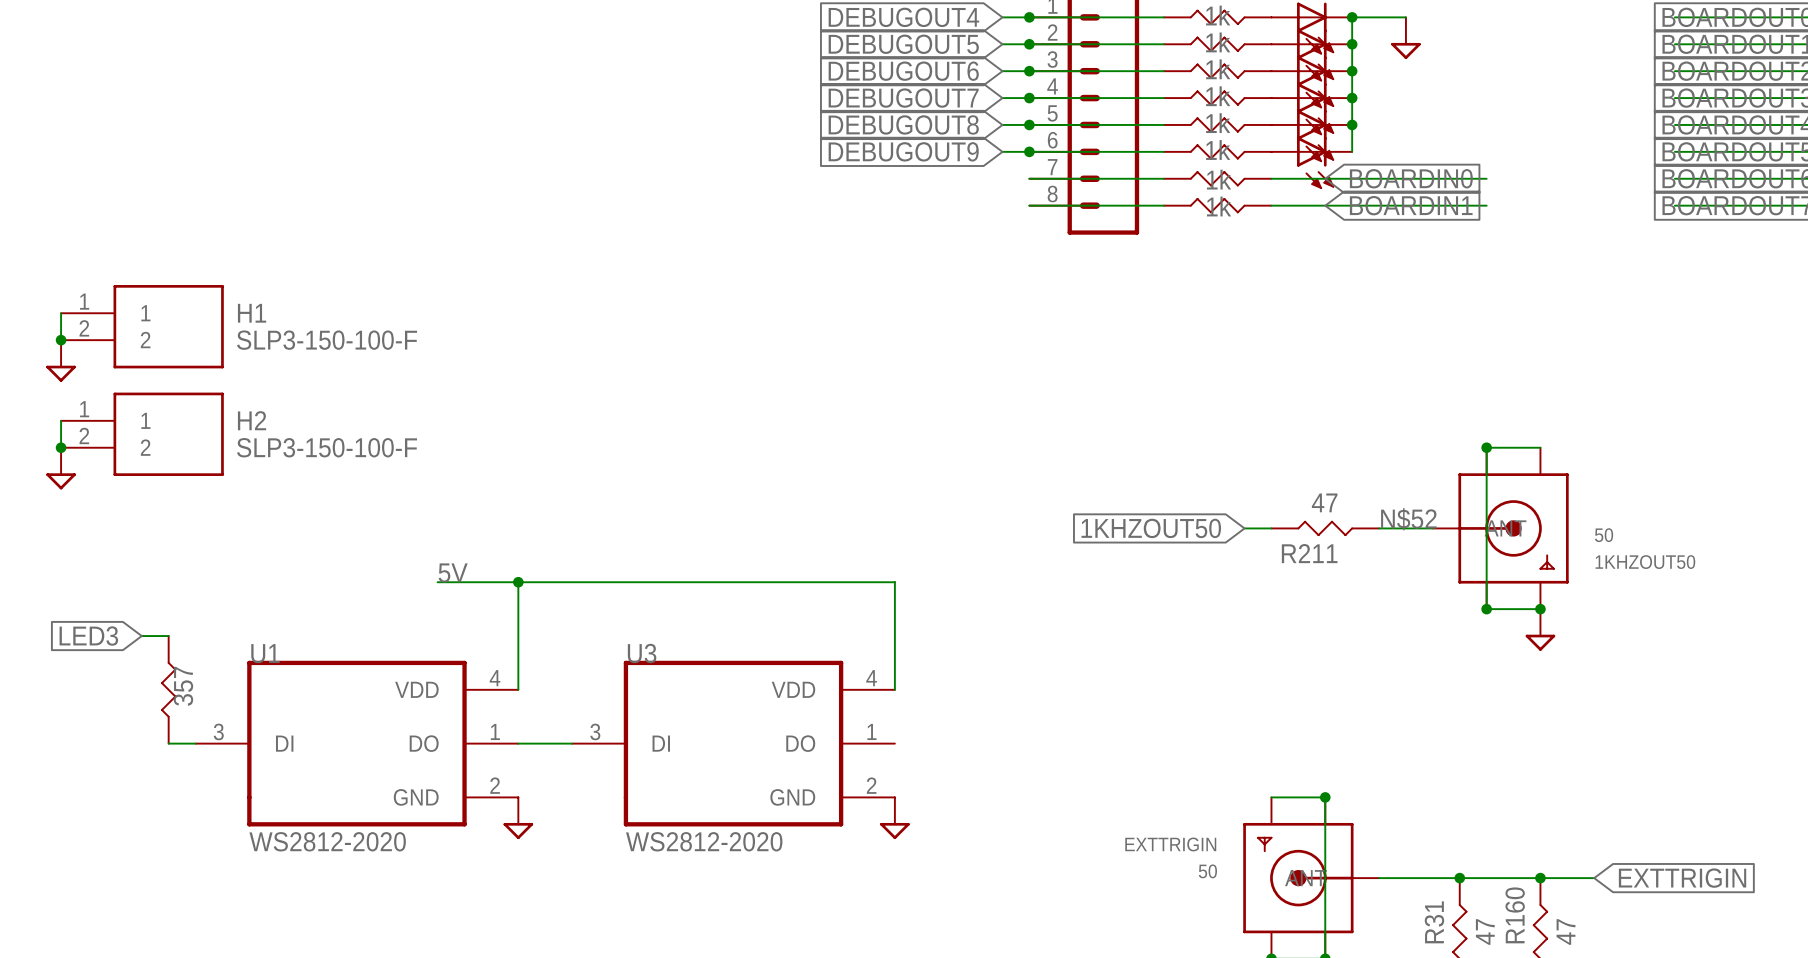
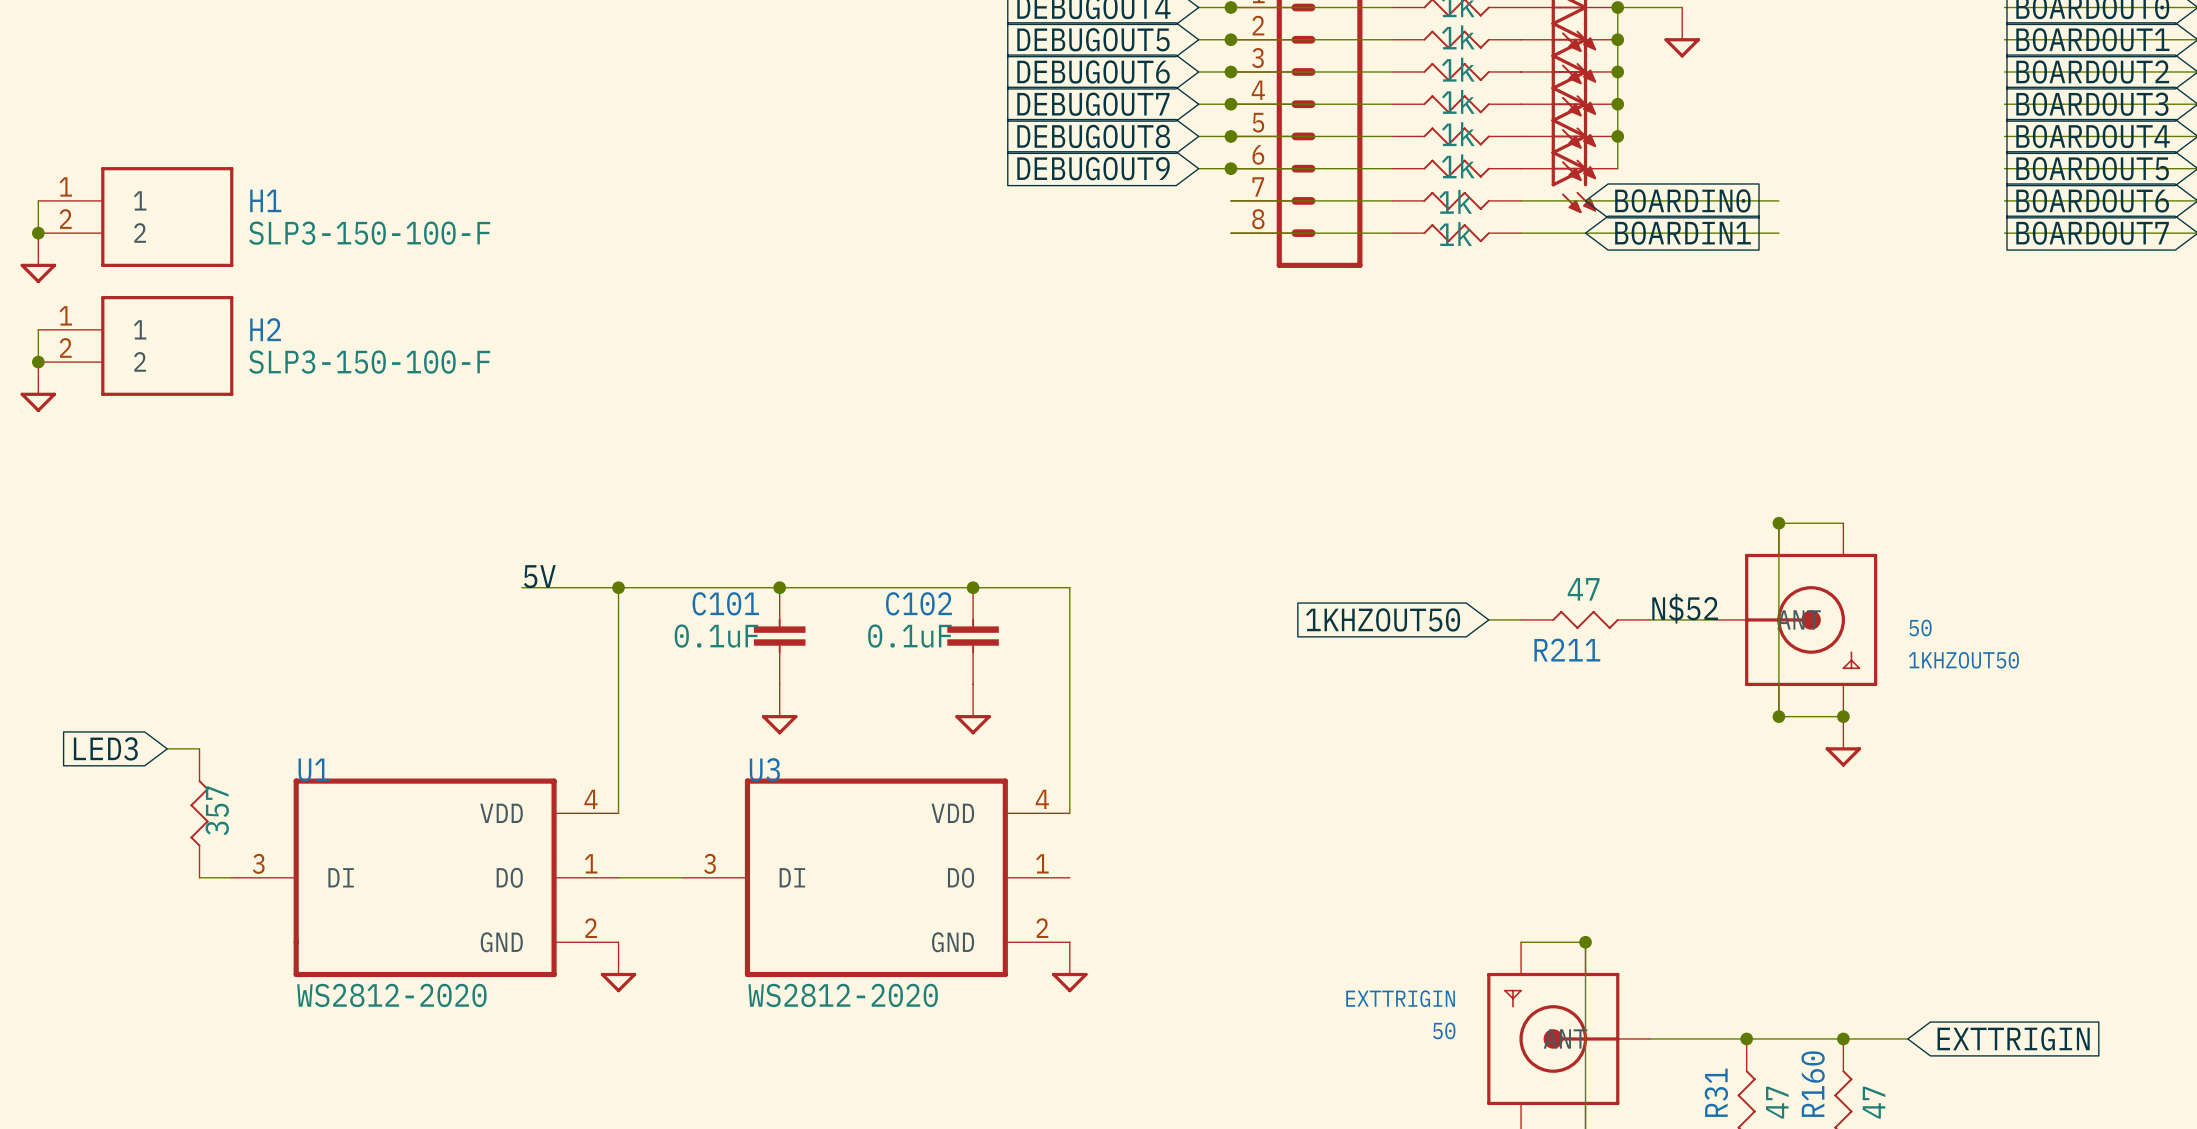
junction: none -> (38, 233)
power symbol: none -> (38, 258)
wire: (61, 313) (61, 340) -> (38, 200) (38, 233)
H1 position: (142, 326) -> (135, 217)
junction position: (61, 340) -> (38, 362)
power symbol position: (61, 361) -> (38, 387)
wire: (61, 420) (61, 447) -> (38, 329) (38, 362)
H2 position: (142, 434) -> (135, 345)
junction: (61, 447) -> none
power symbol: (61, 468) -> none
wire: none -> (618, 587) (618, 684)
junction: none -> (618, 587)
junction: none -> (779, 587)
junction: none -> (973, 587)
C101: none -> 0.1uF (779, 636)
C102: none -> 0.1uF (973, 636)
label position: 5V (453, 572) -> 5V (539, 576)
wire: (437, 582) (894, 582) -> (521, 587) (1069, 587) (1069, 684)
junction: (518, 582) -> none
power symbol: none -> (779, 709)
power symbol: none -> (973, 709)

